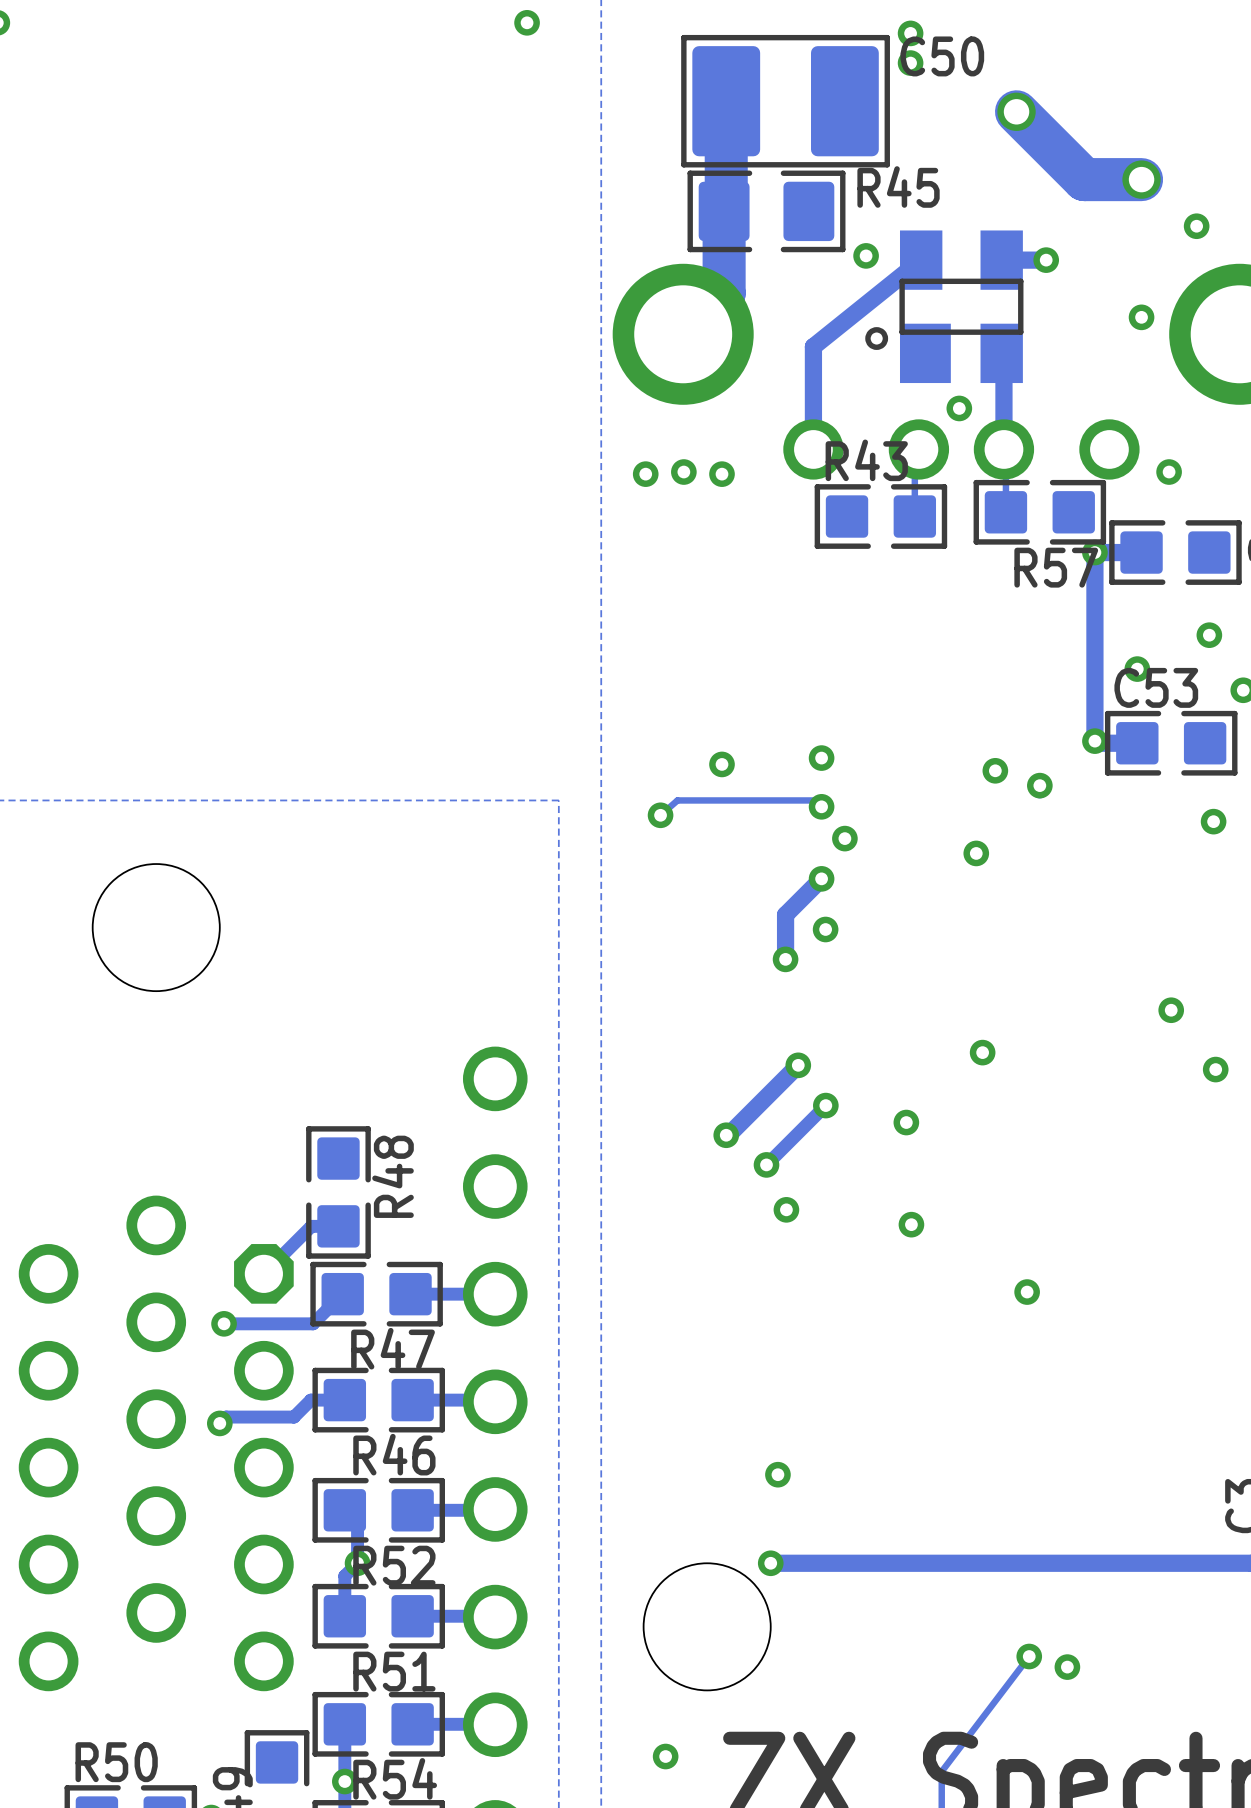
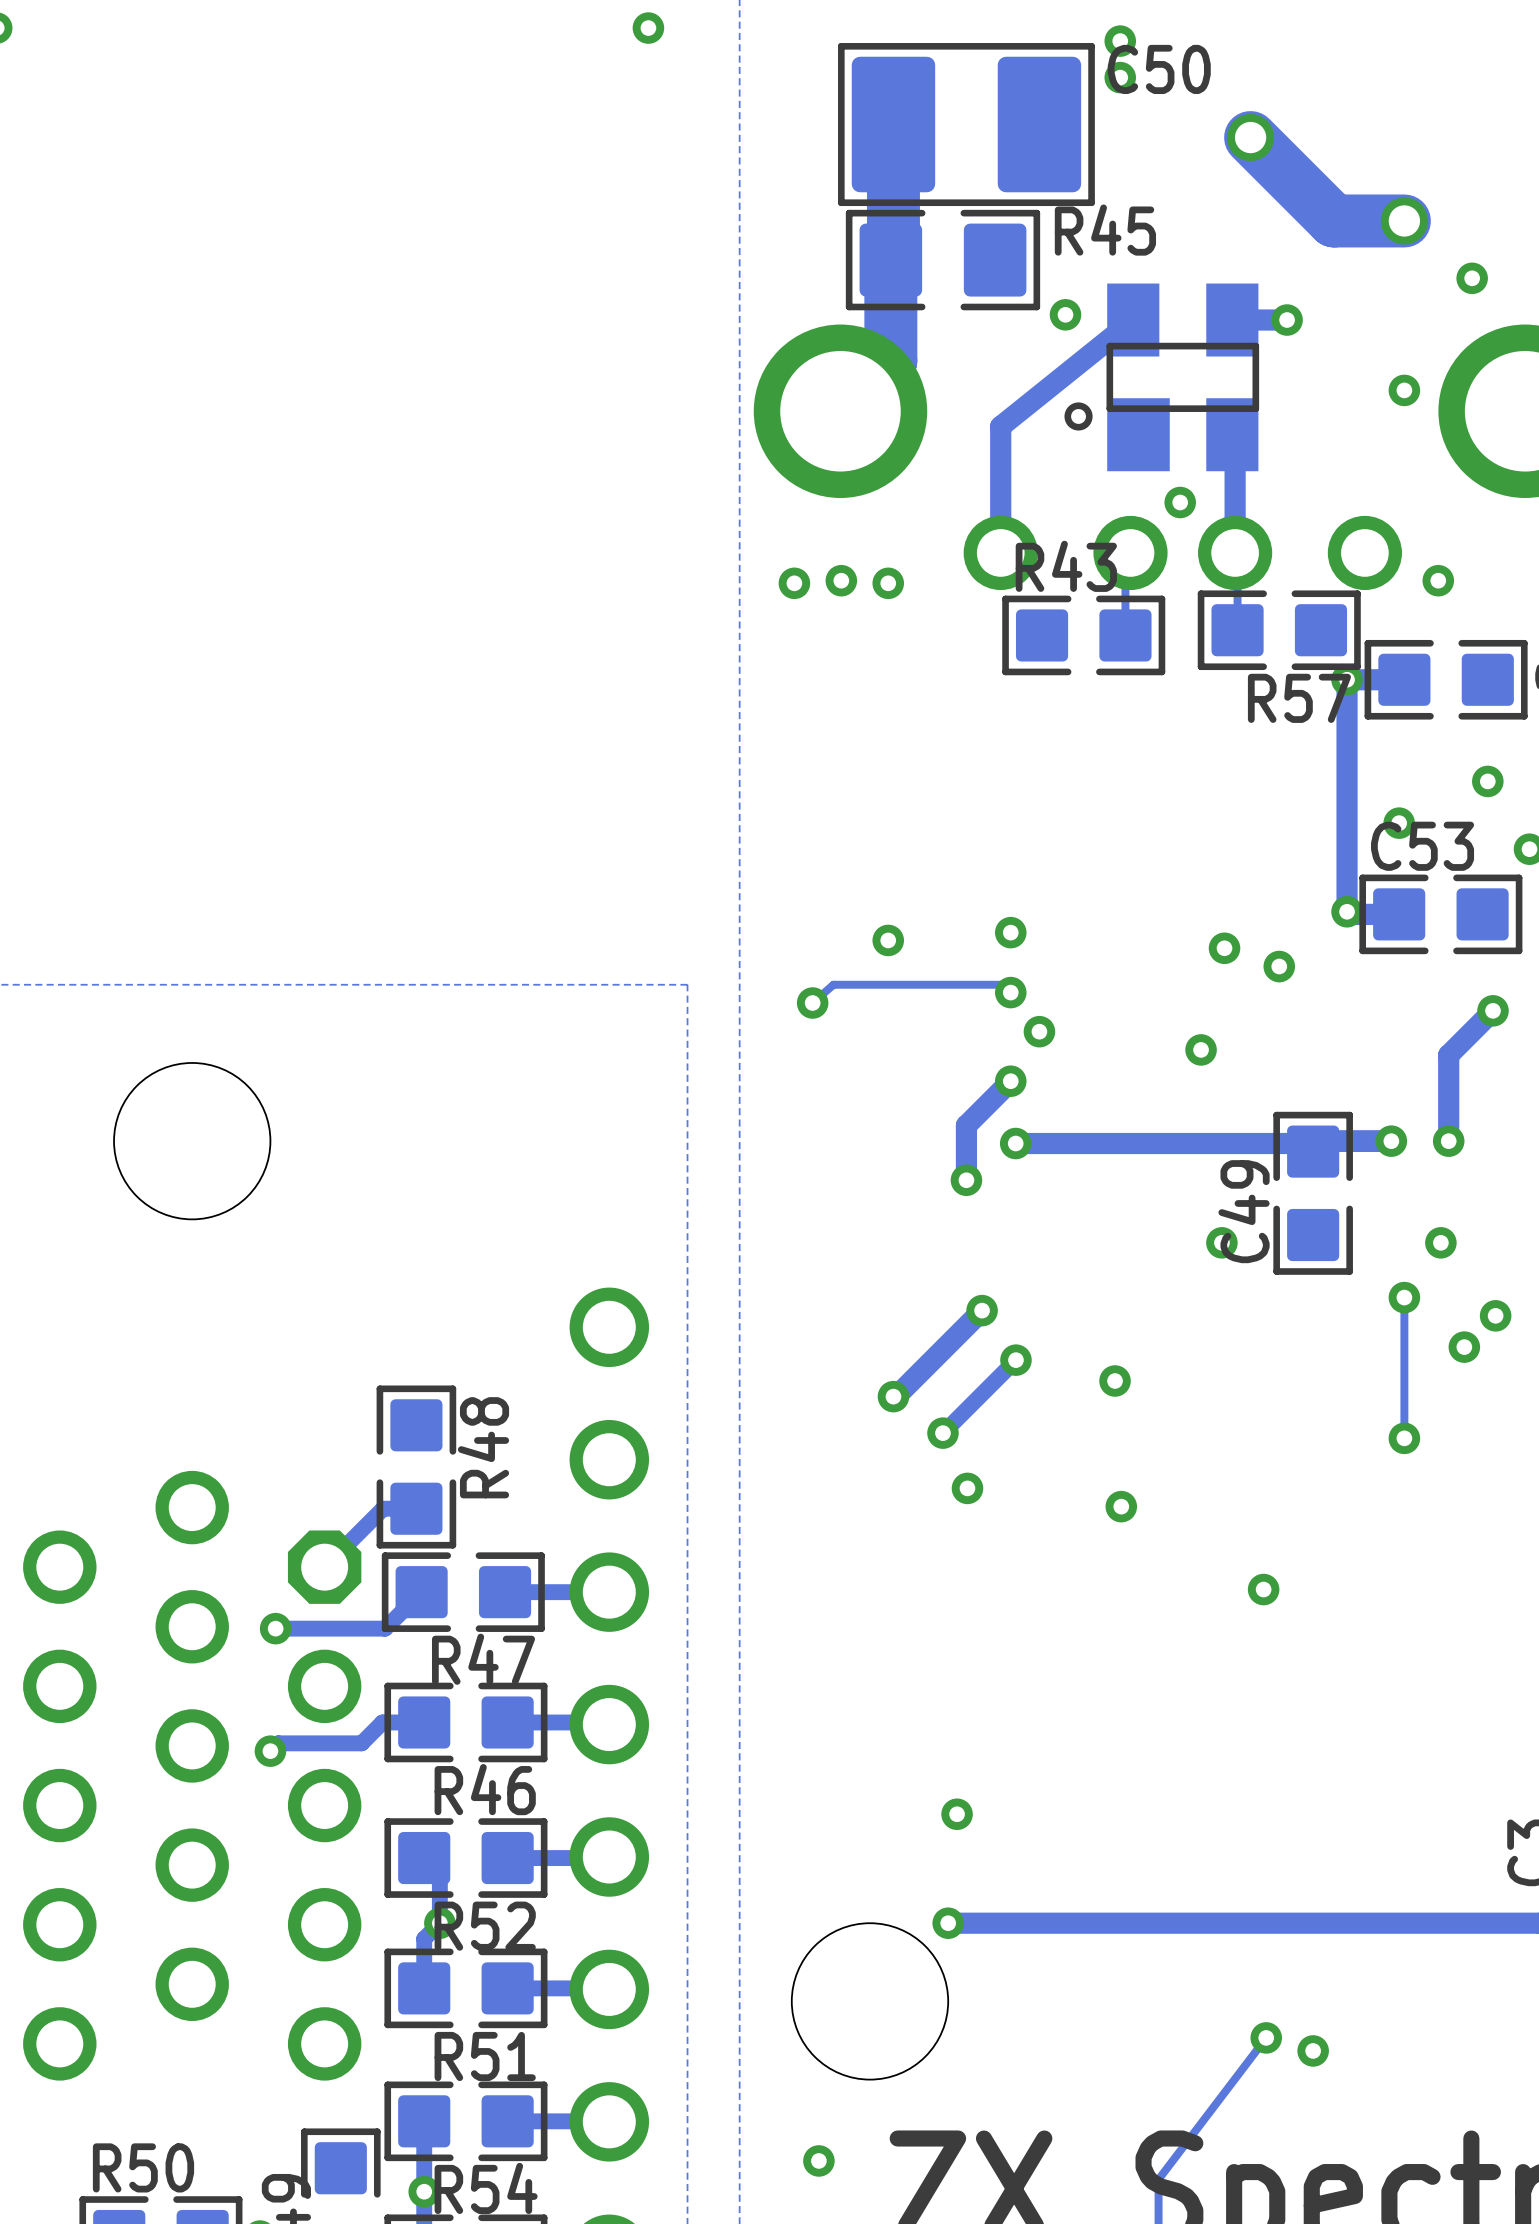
track: none -> (1493, 1010) (1448, 1055) (1448, 1141)
track: none -> (1391, 1141) (1313, 1141) (1310, 1143) (1015, 1143)
via: none -> (1391, 1141)
via: none -> (1448, 1141)
C49: none -> (1313, 1193)
via position: (982, 1052) -> (1221, 1242)
track: none -> (1404, 1297) (1404, 1438)
via: none -> (1404, 1297)
via: none -> (1464, 1347)
via: none -> (1404, 1438)

